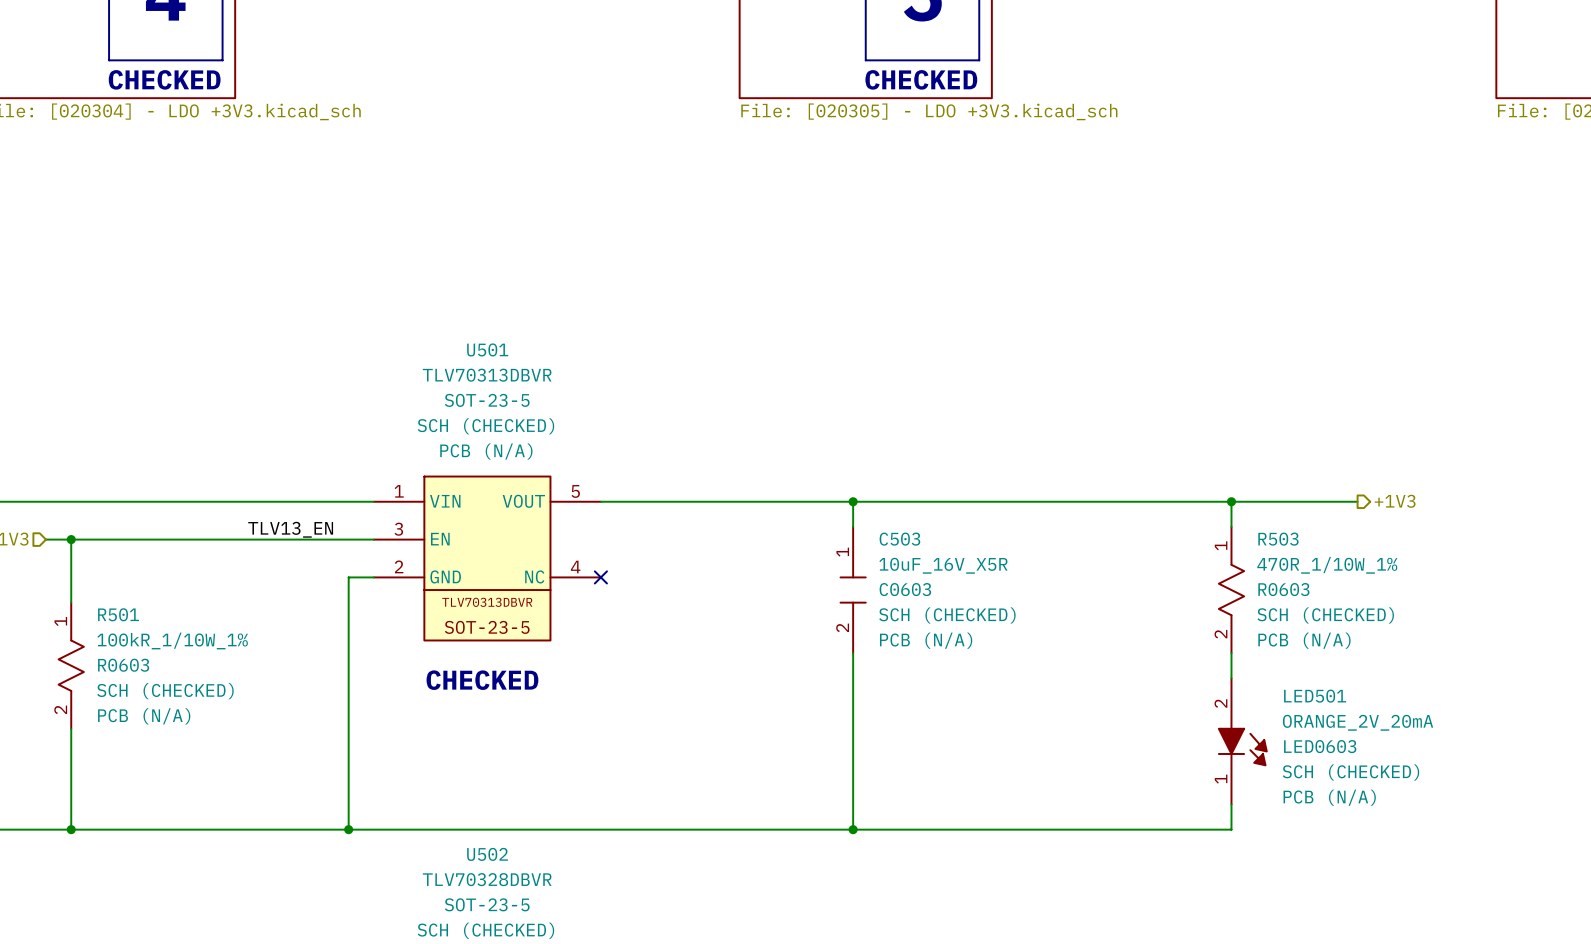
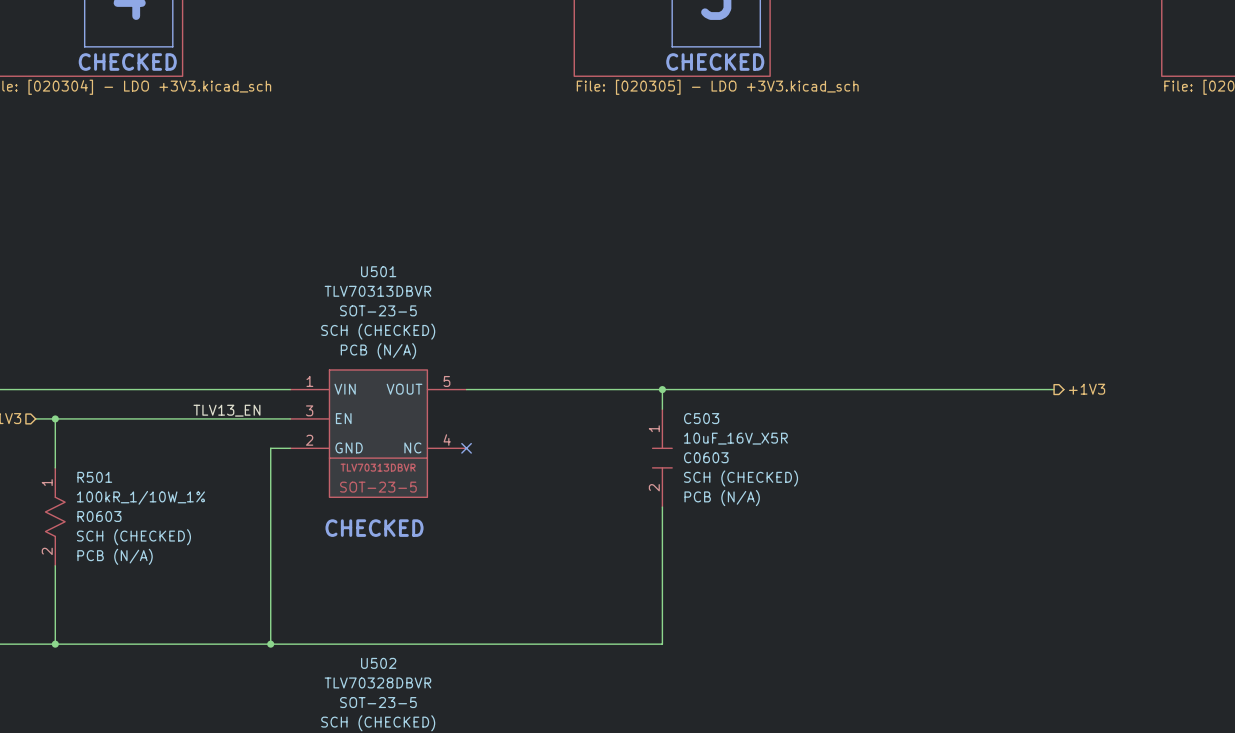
wire: (1231, 501) (1231, 526) -> none
junction: (1231, 501) -> none
R503: 470R_1/10W_1% (1231, 590) -> none
wire: (1231, 653) (1231, 678) -> none
LED501: ORANGE_2V_20mA (1242, 741) -> none
wire: (1231, 804) (1231, 829) (853, 829) -> none
junction: (853, 829) -> none

